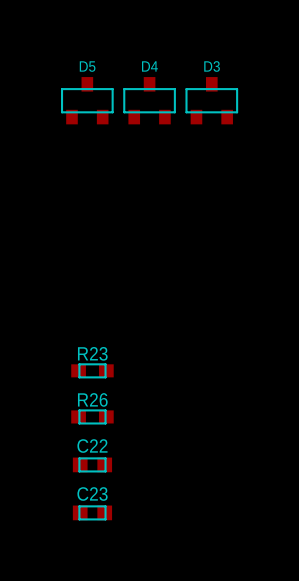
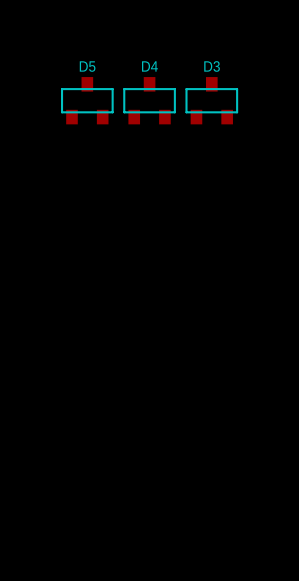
R23: (92, 370) -> none
R26: (92, 416) -> none
C22: (92, 464) -> none
C23: (92, 512) -> none

